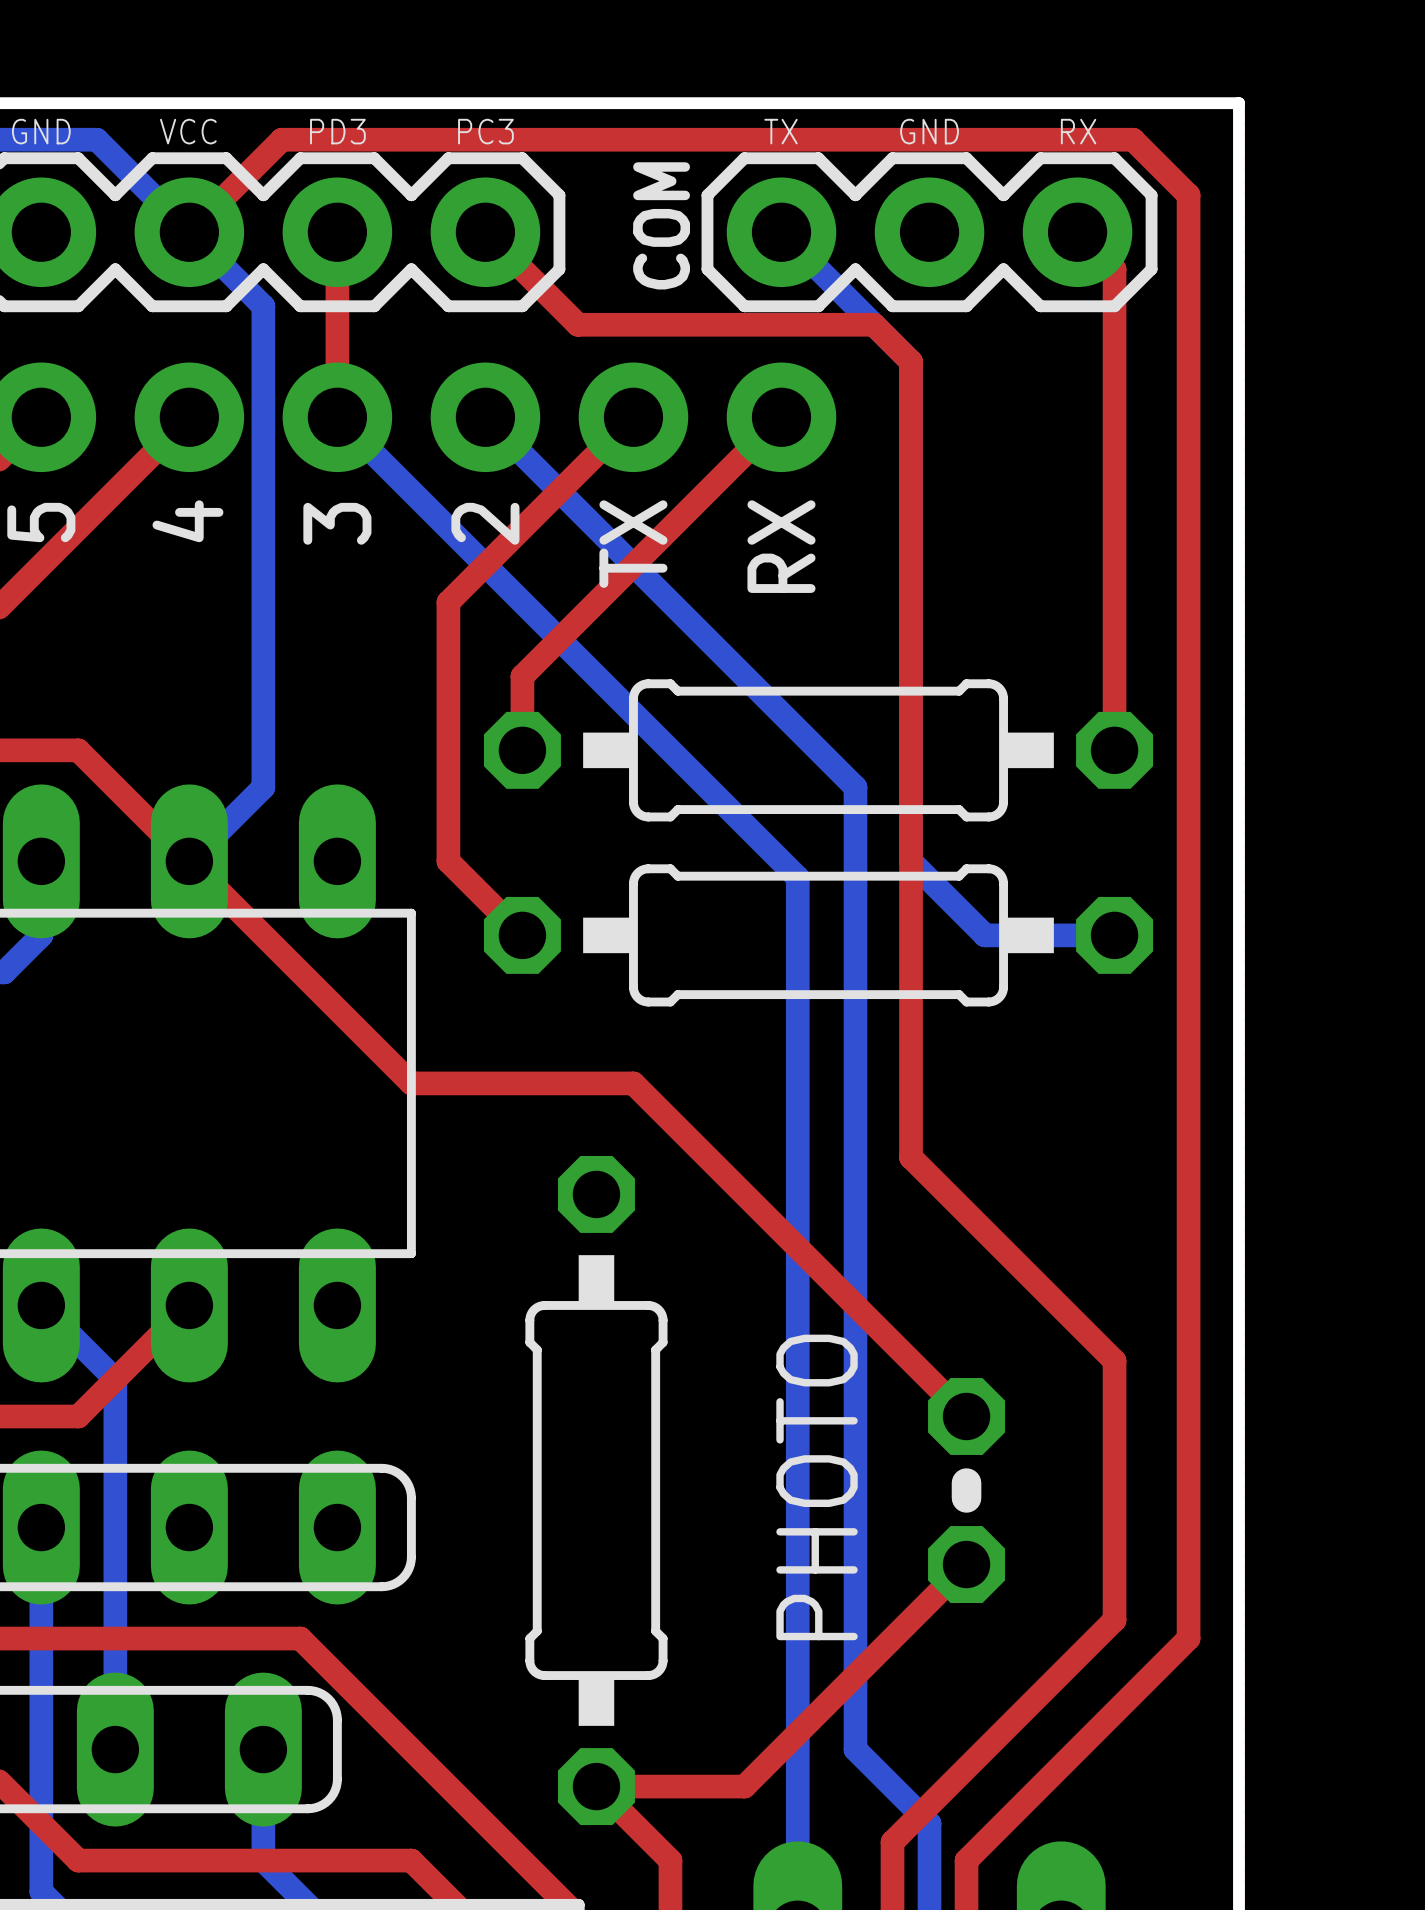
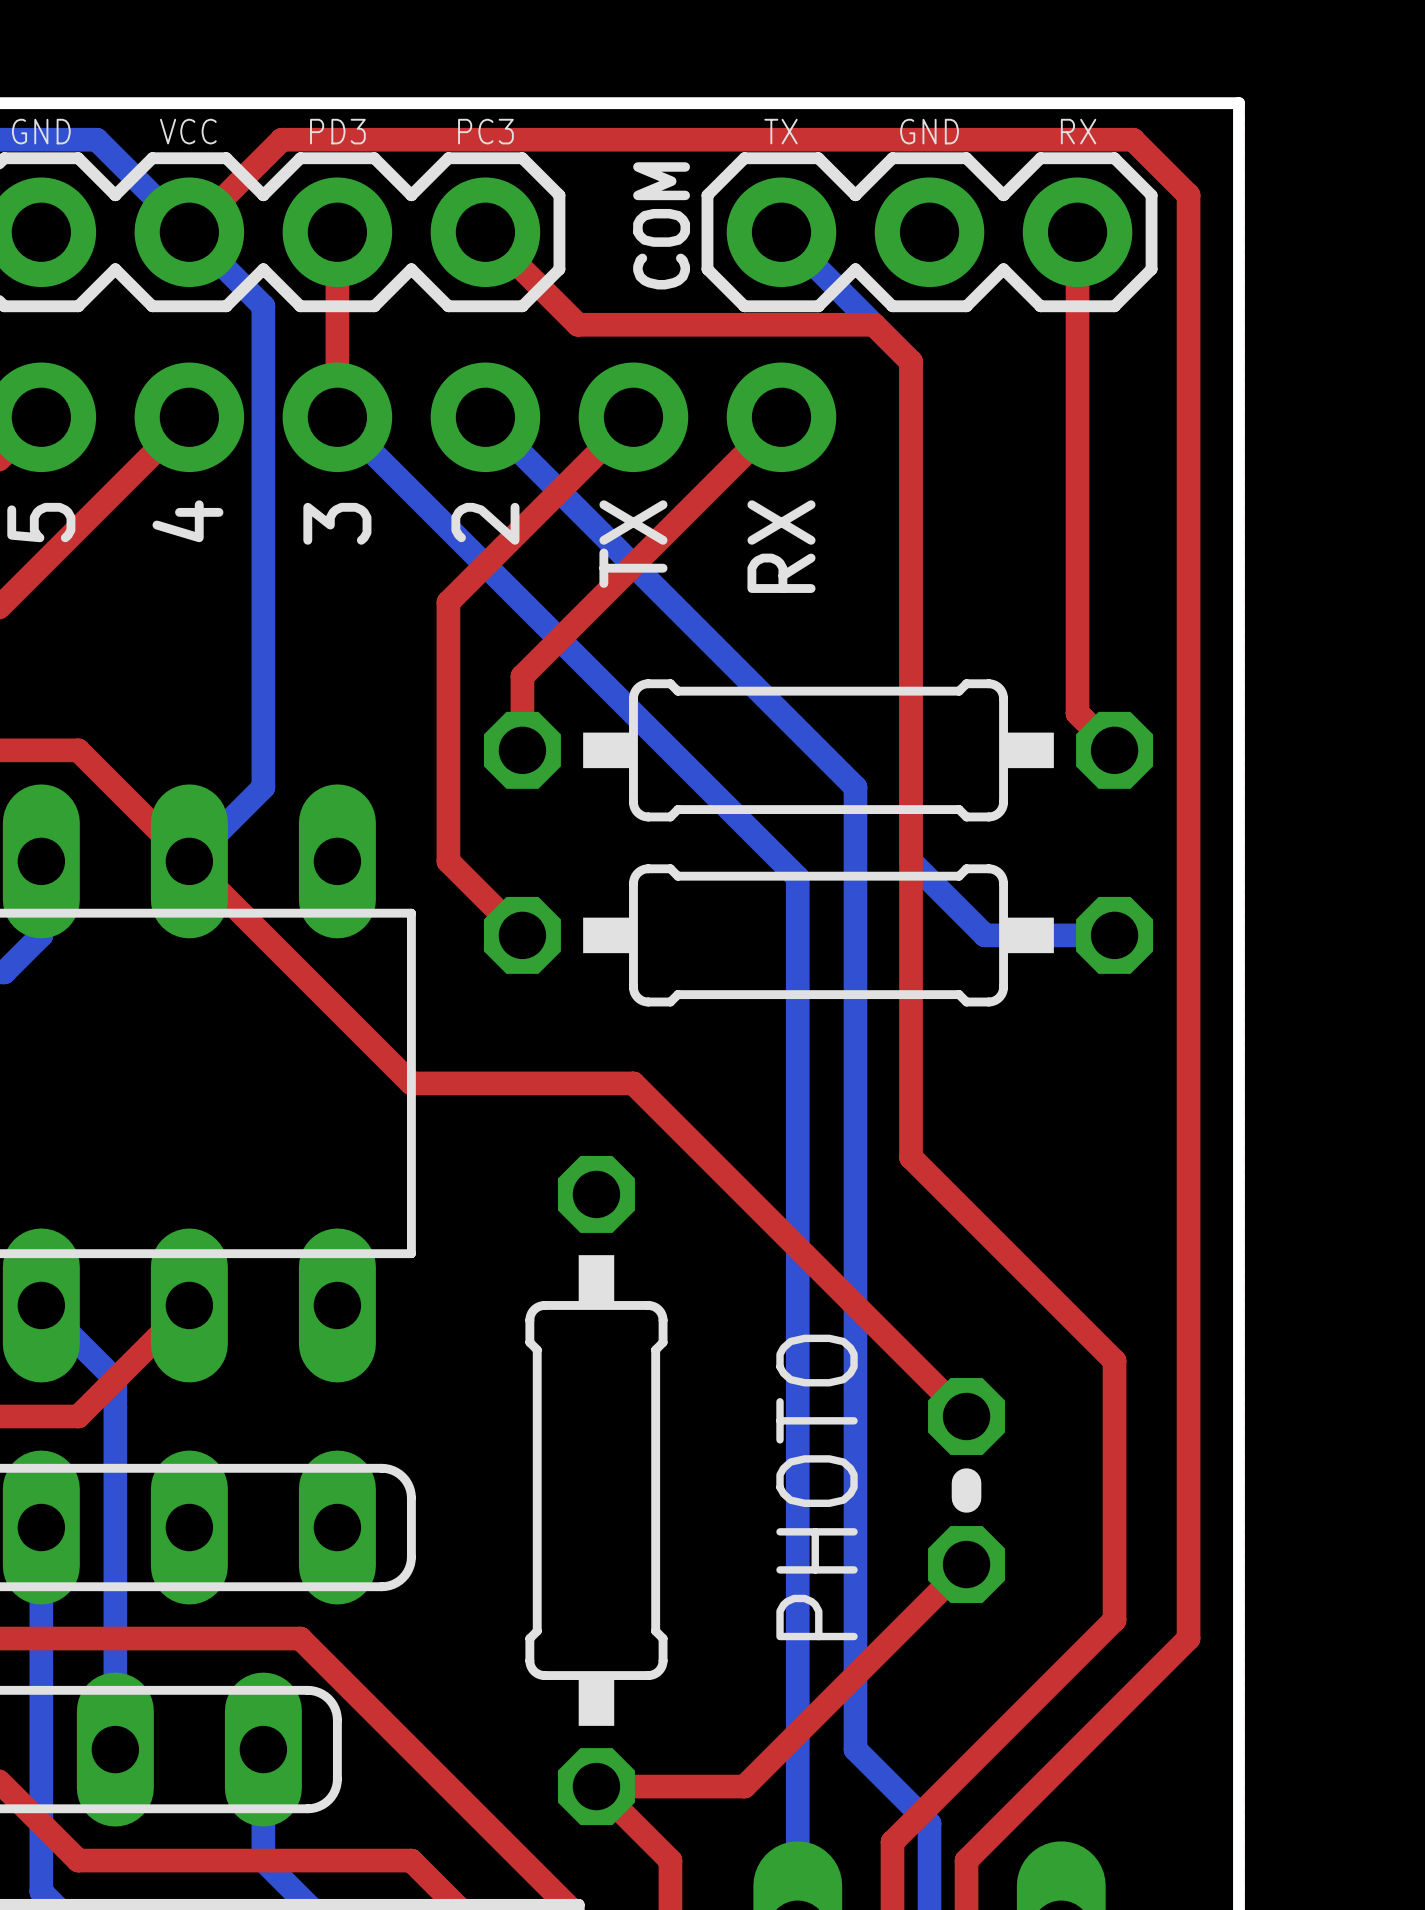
top track: (1077, 232) (1114, 269) (1114, 750) -> (1077, 232) (1077, 713) (1114, 750)

